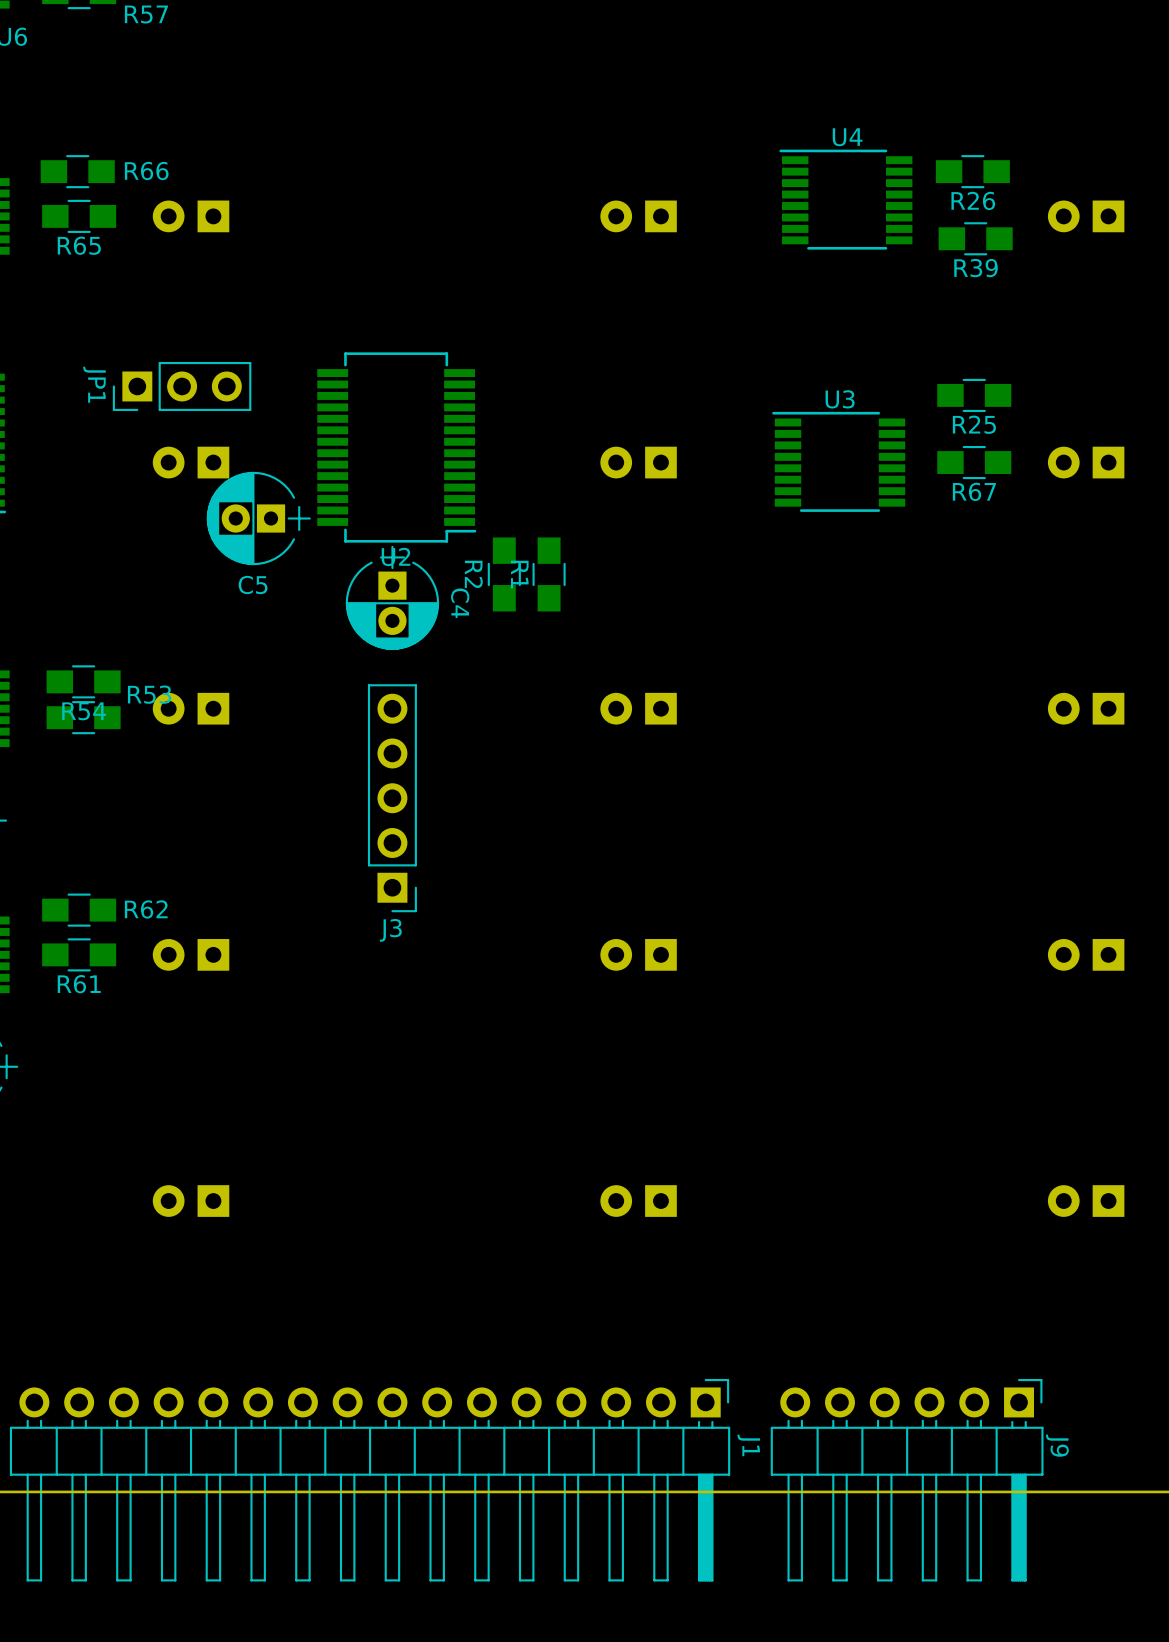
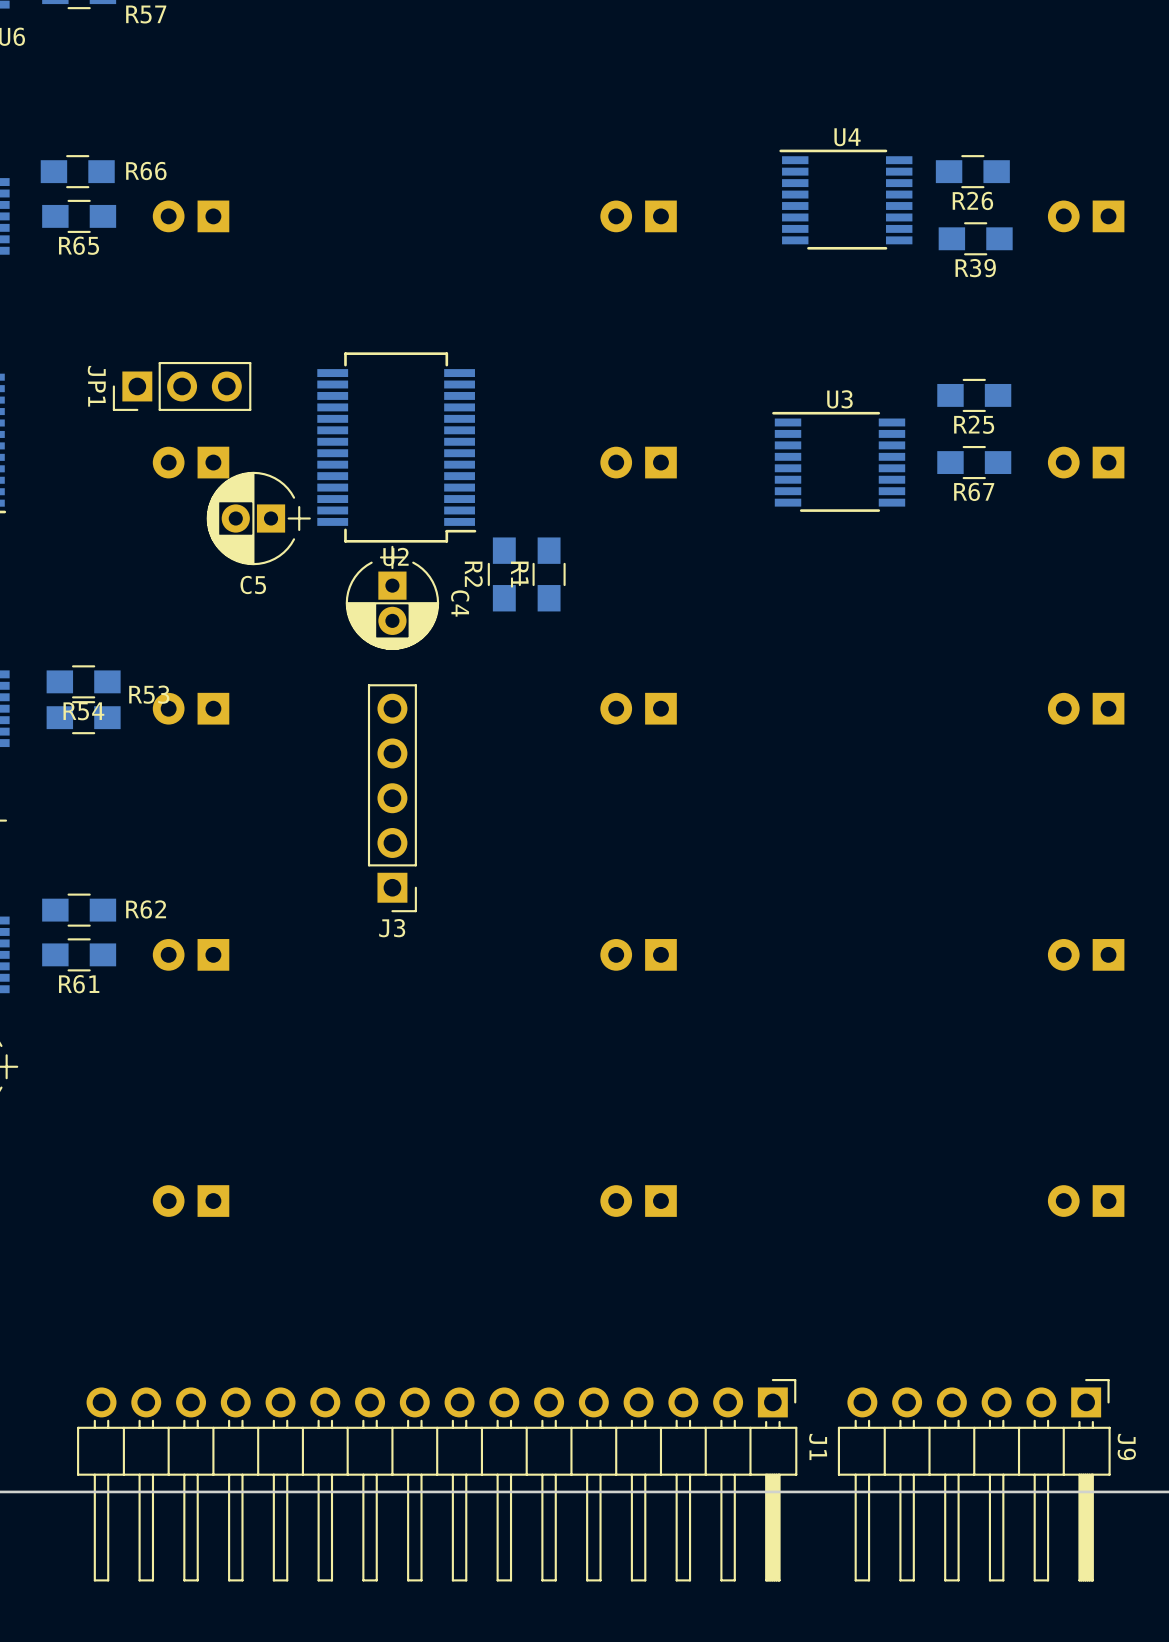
J1 position: (370, 1480) -> (437, 1480)
J9 position: (907, 1480) -> (974, 1480)

